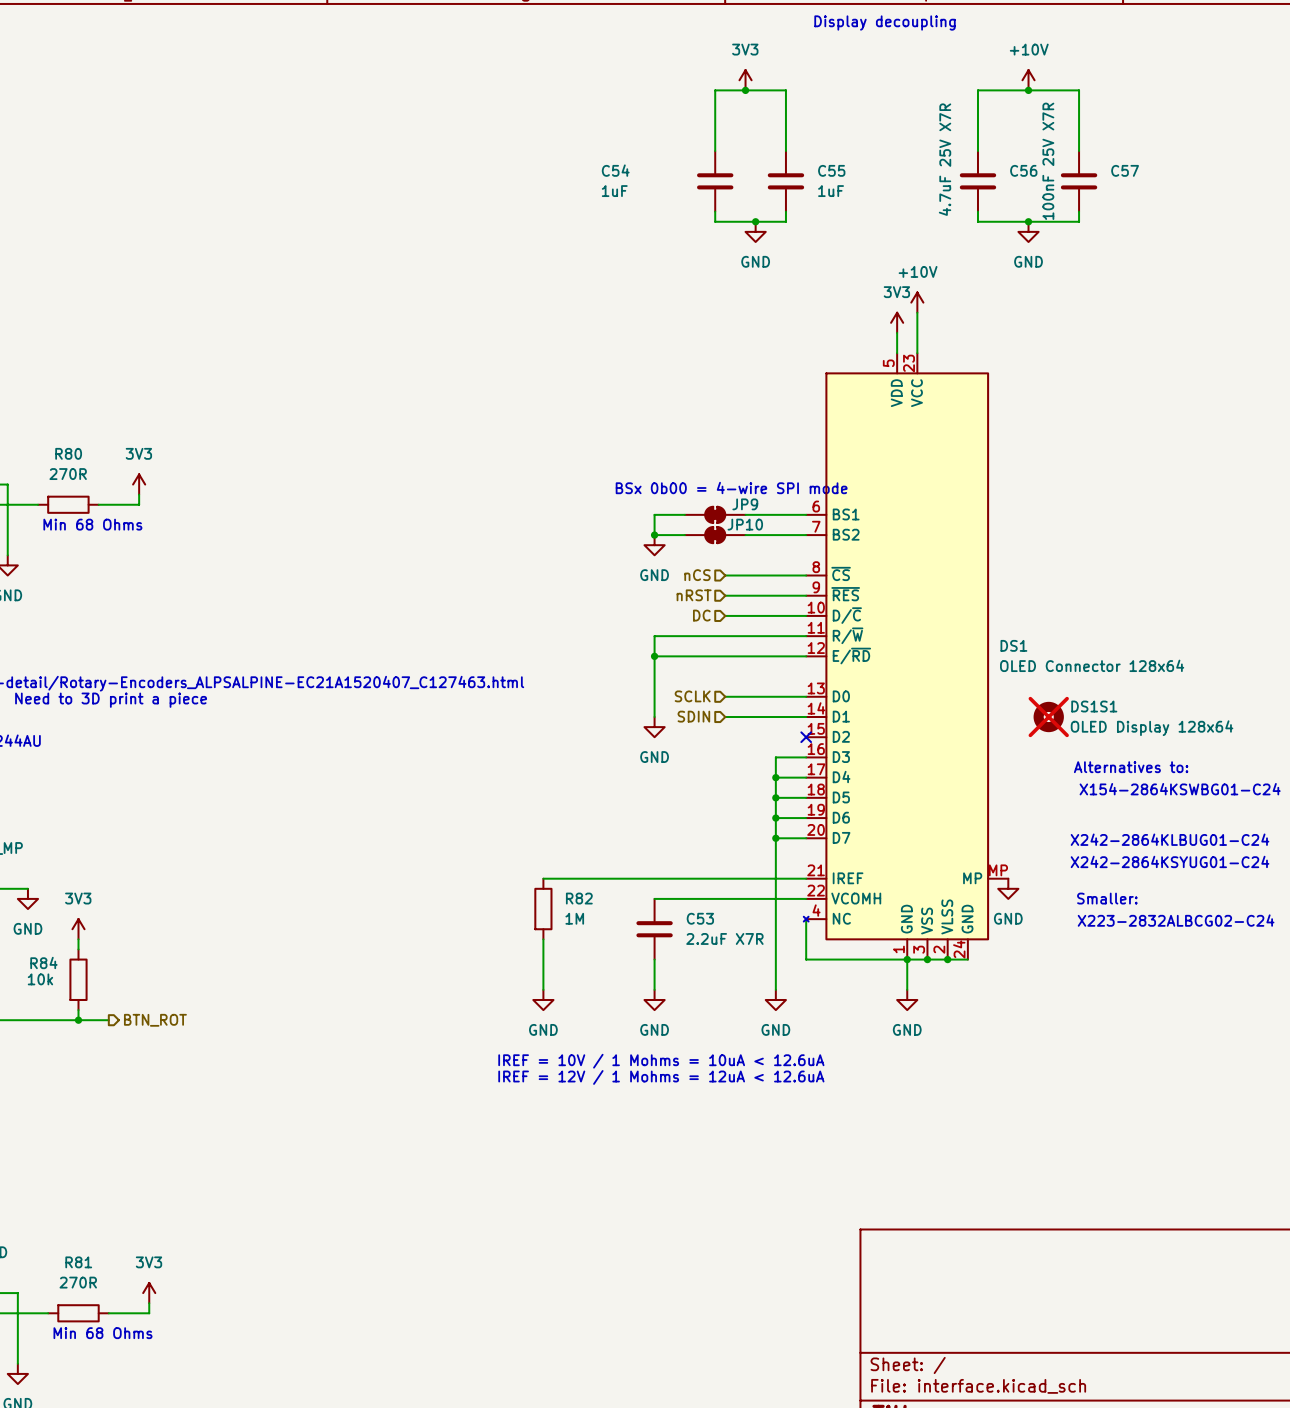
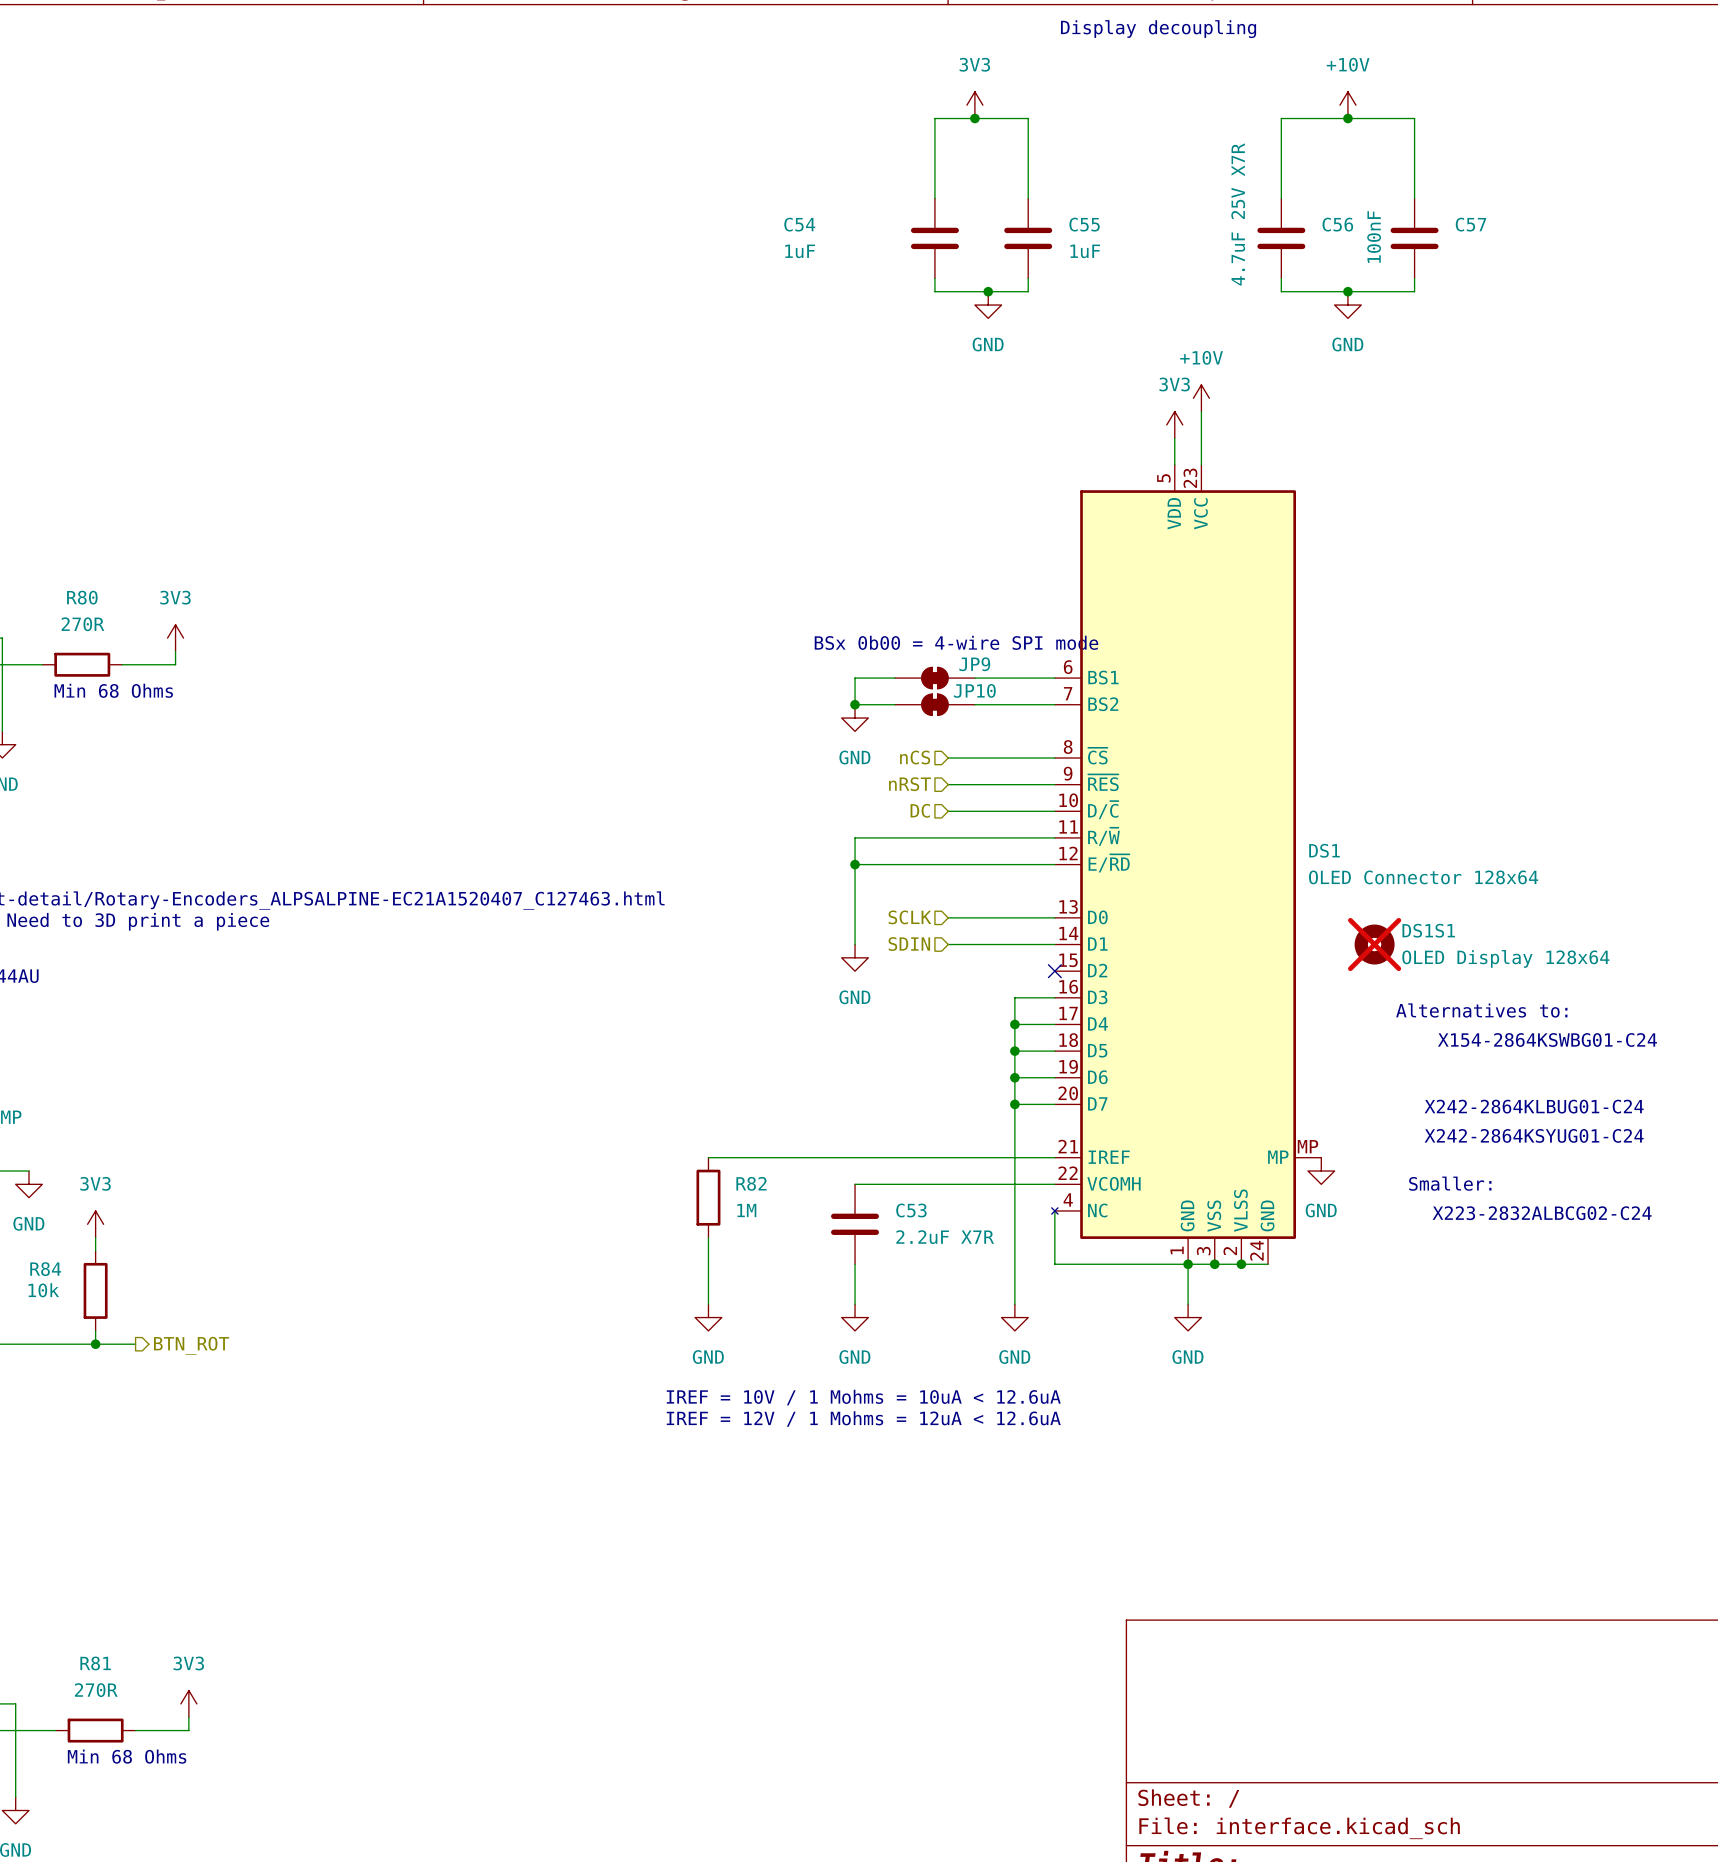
C57 value: 100nF 25V X7R (1048, 161) -> 100nF (1374, 237)

